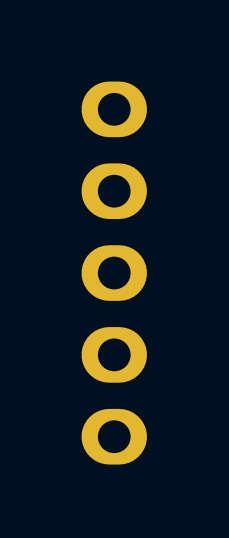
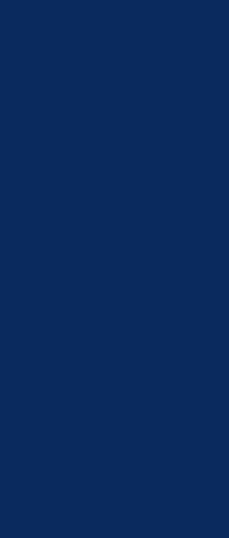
part: (114, 273) -> none

